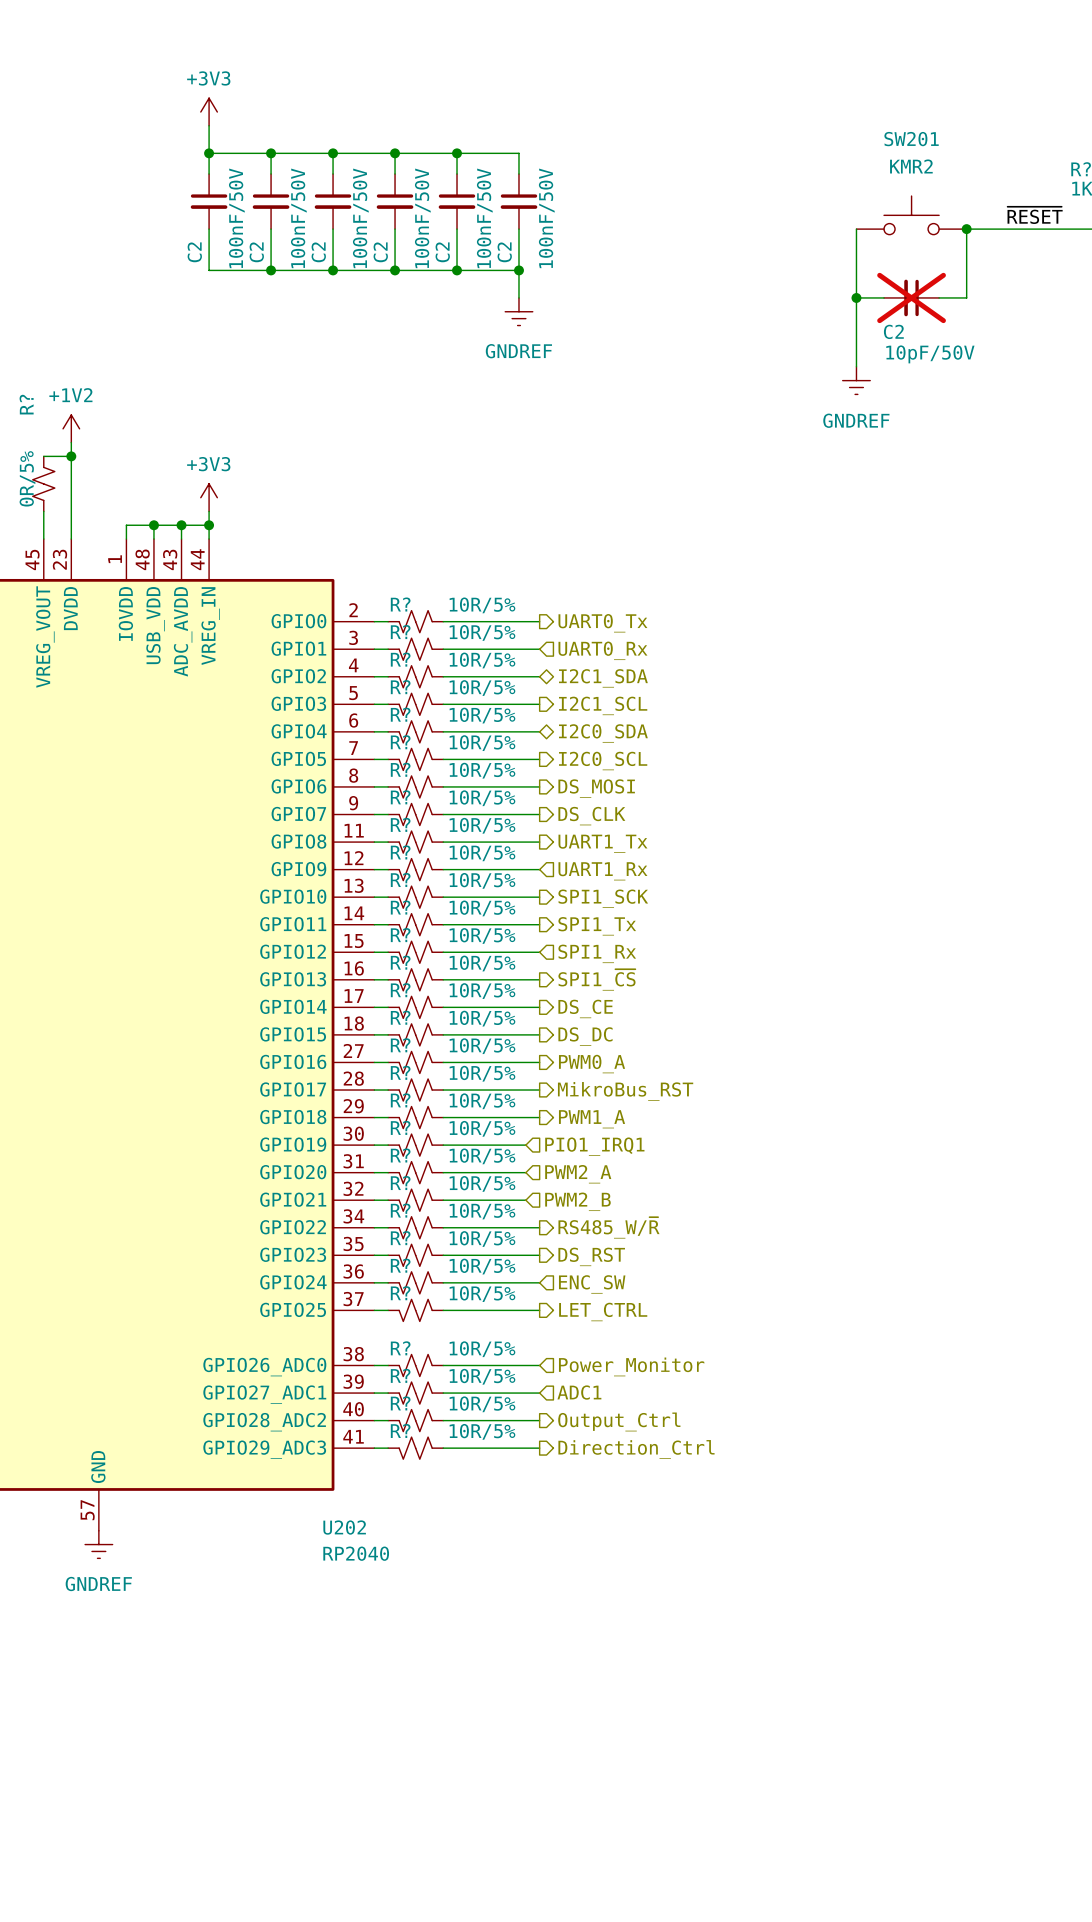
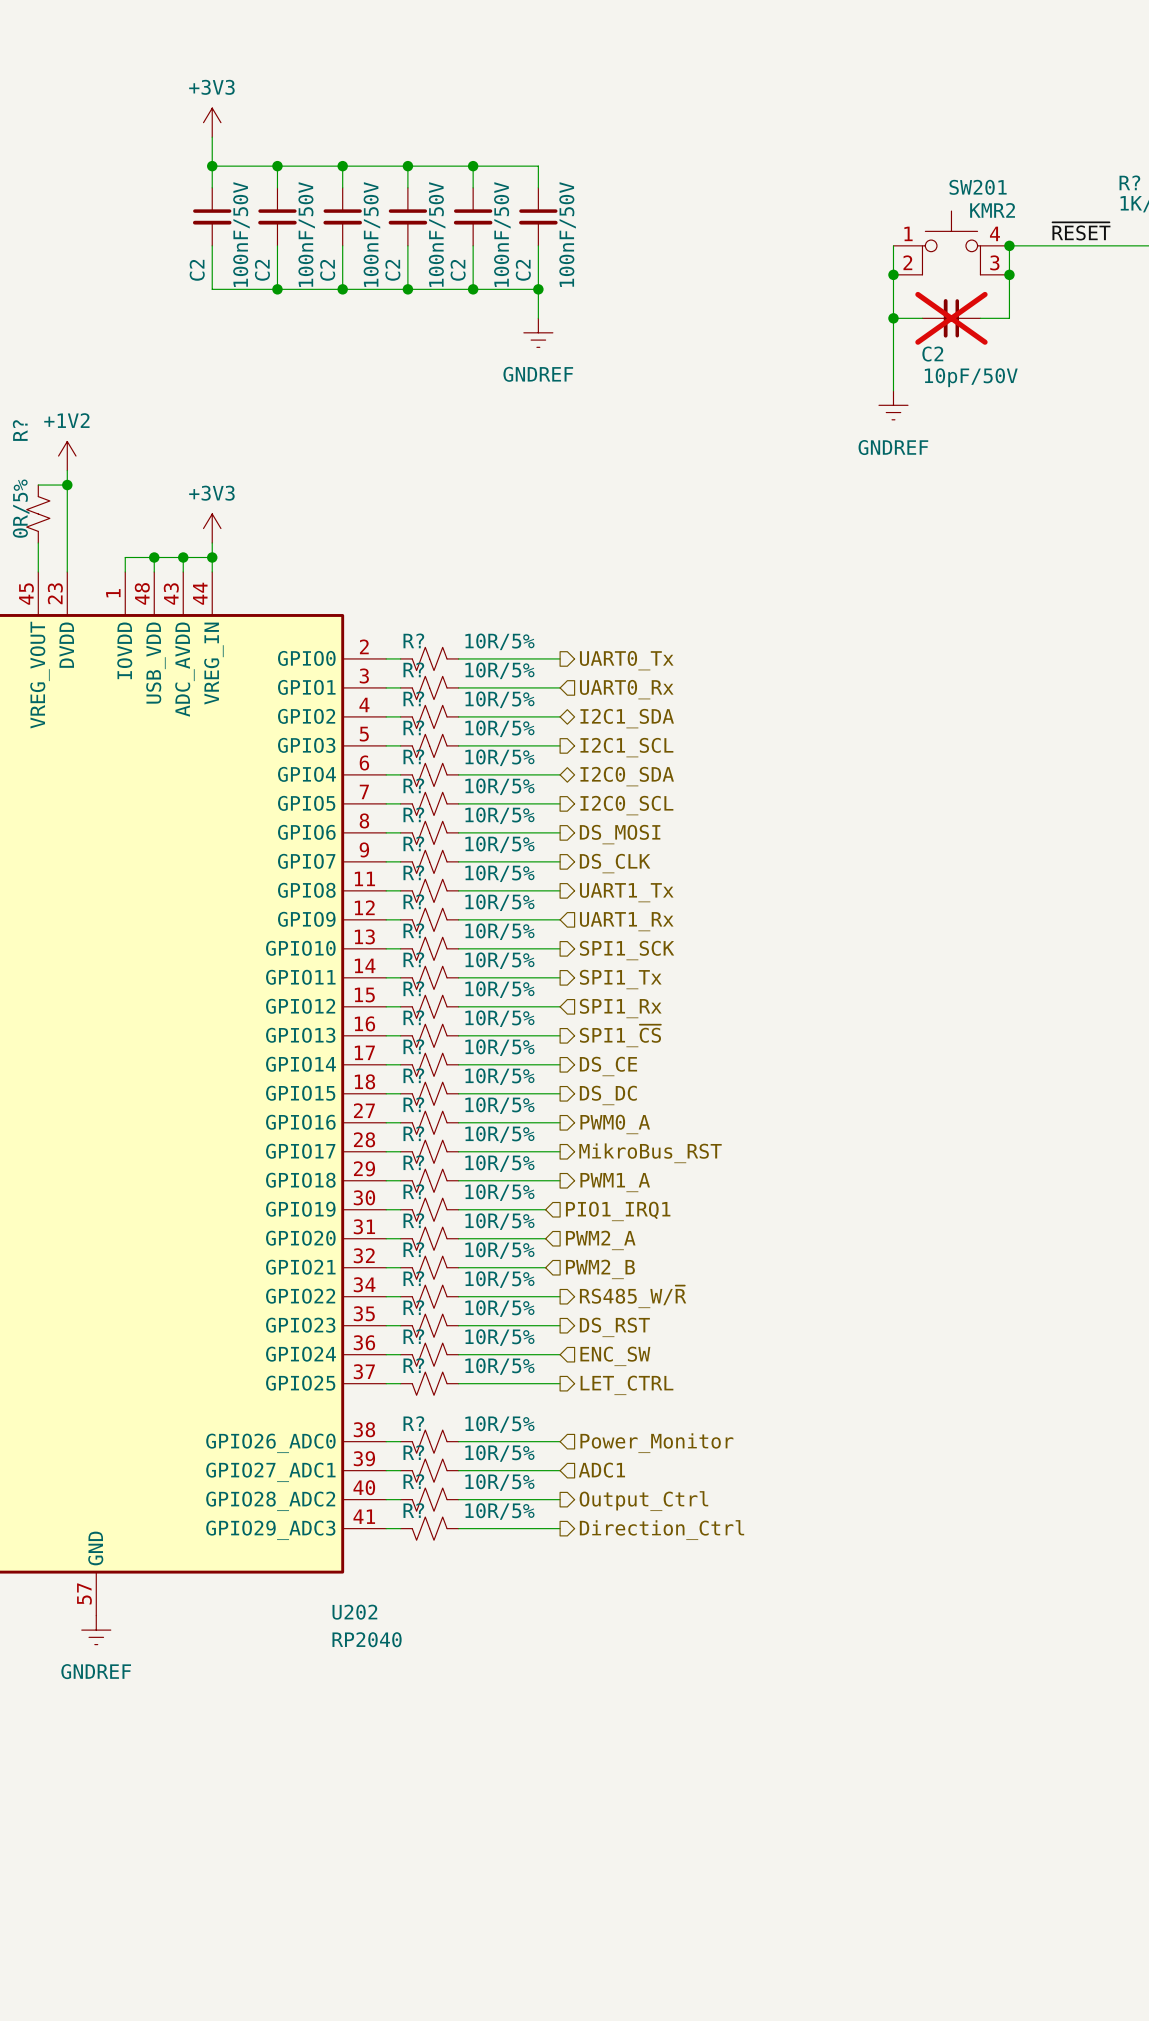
SW201 name position: SW201 (911, 139) -> SW201 (978, 187)
SW201 value position: KMR2 (911, 166) -> KMR2 (992, 210)
SW201 symbol: [856, 196, 967, 235] -> [893, 211, 1010, 275]
junction: none -> (893, 274)
junction: none -> (1009, 274)

